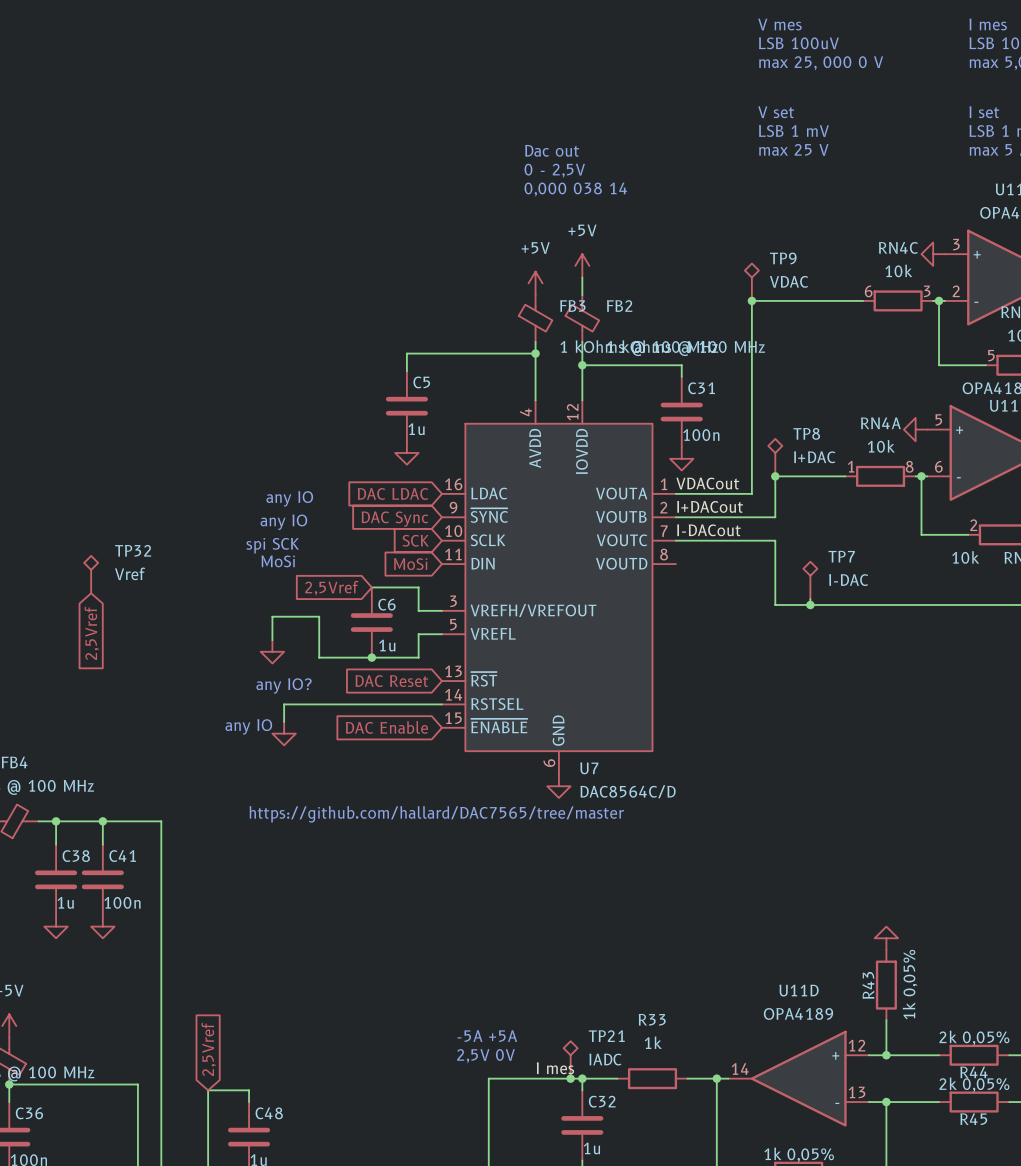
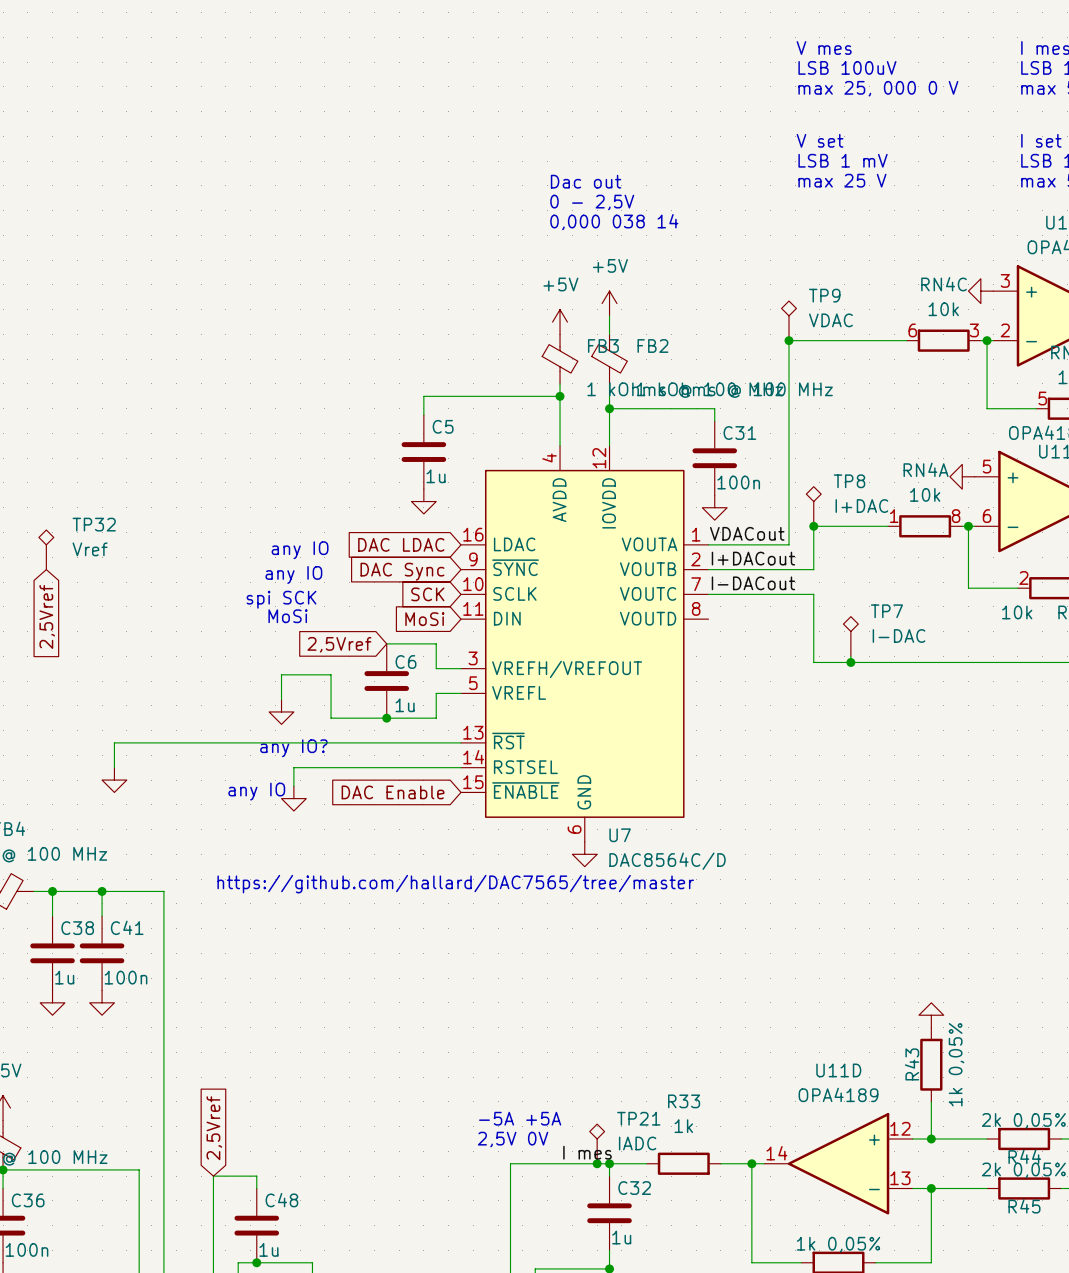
TP32 position: (91, 574) -> (46, 549)
global label position: 2,5Vref (91, 633) -> 2,5Vref (47, 616)
global label: DAC Reset (391, 681) -> none
wire: none -> (460, 742) (114, 742) (114, 767)
power symbol: none -> (114, 780)

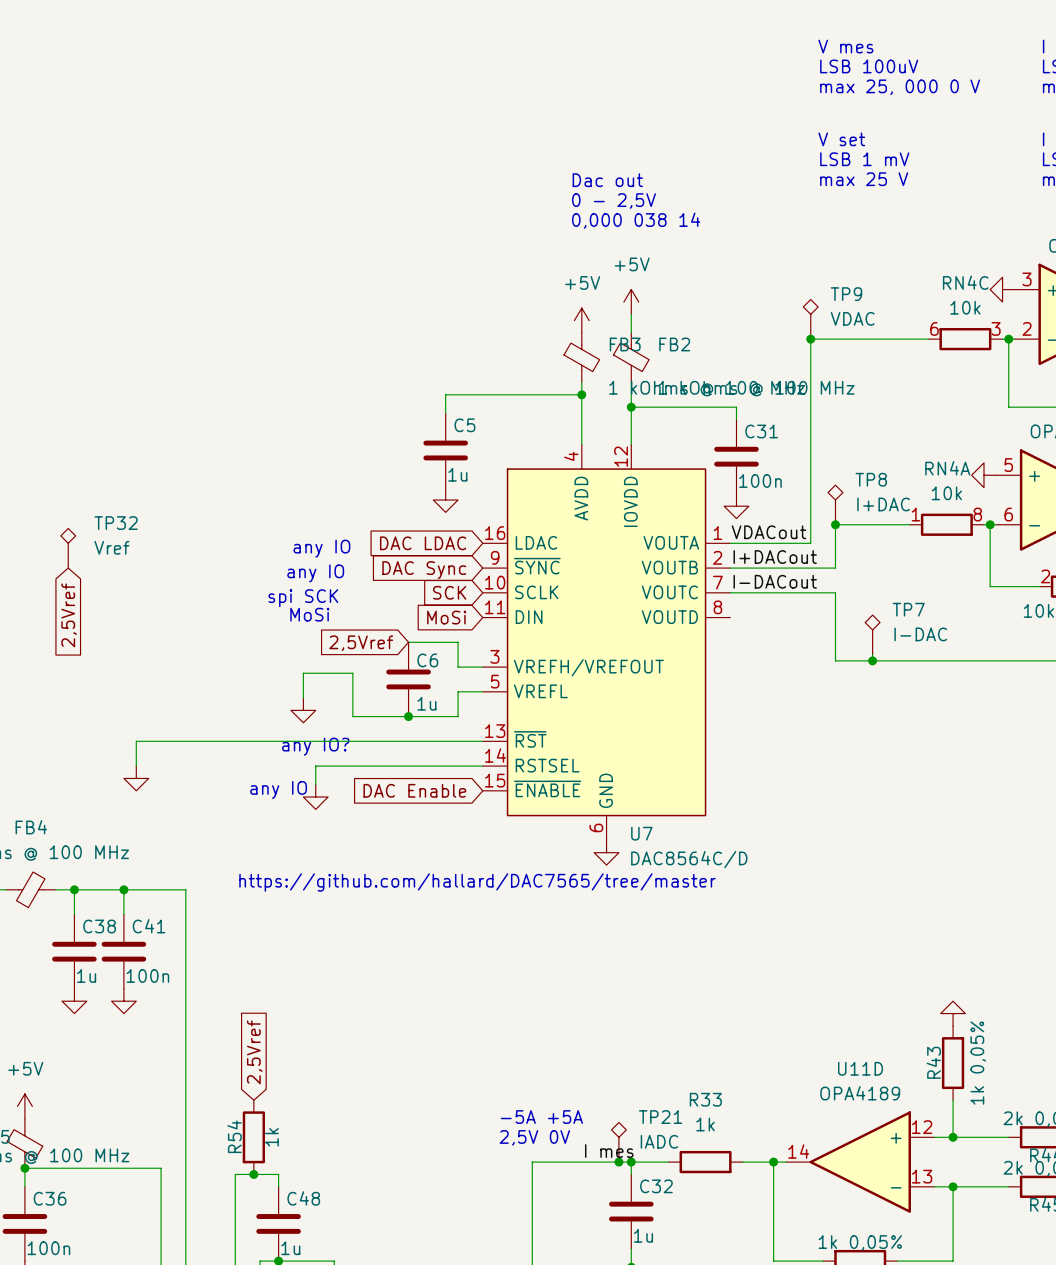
global label position: 2,5Vref (214, 1128) -> 2,5Vref (254, 1052)
R54: none -> 1k (253, 1137)
junction: none -> (253, 1174)

